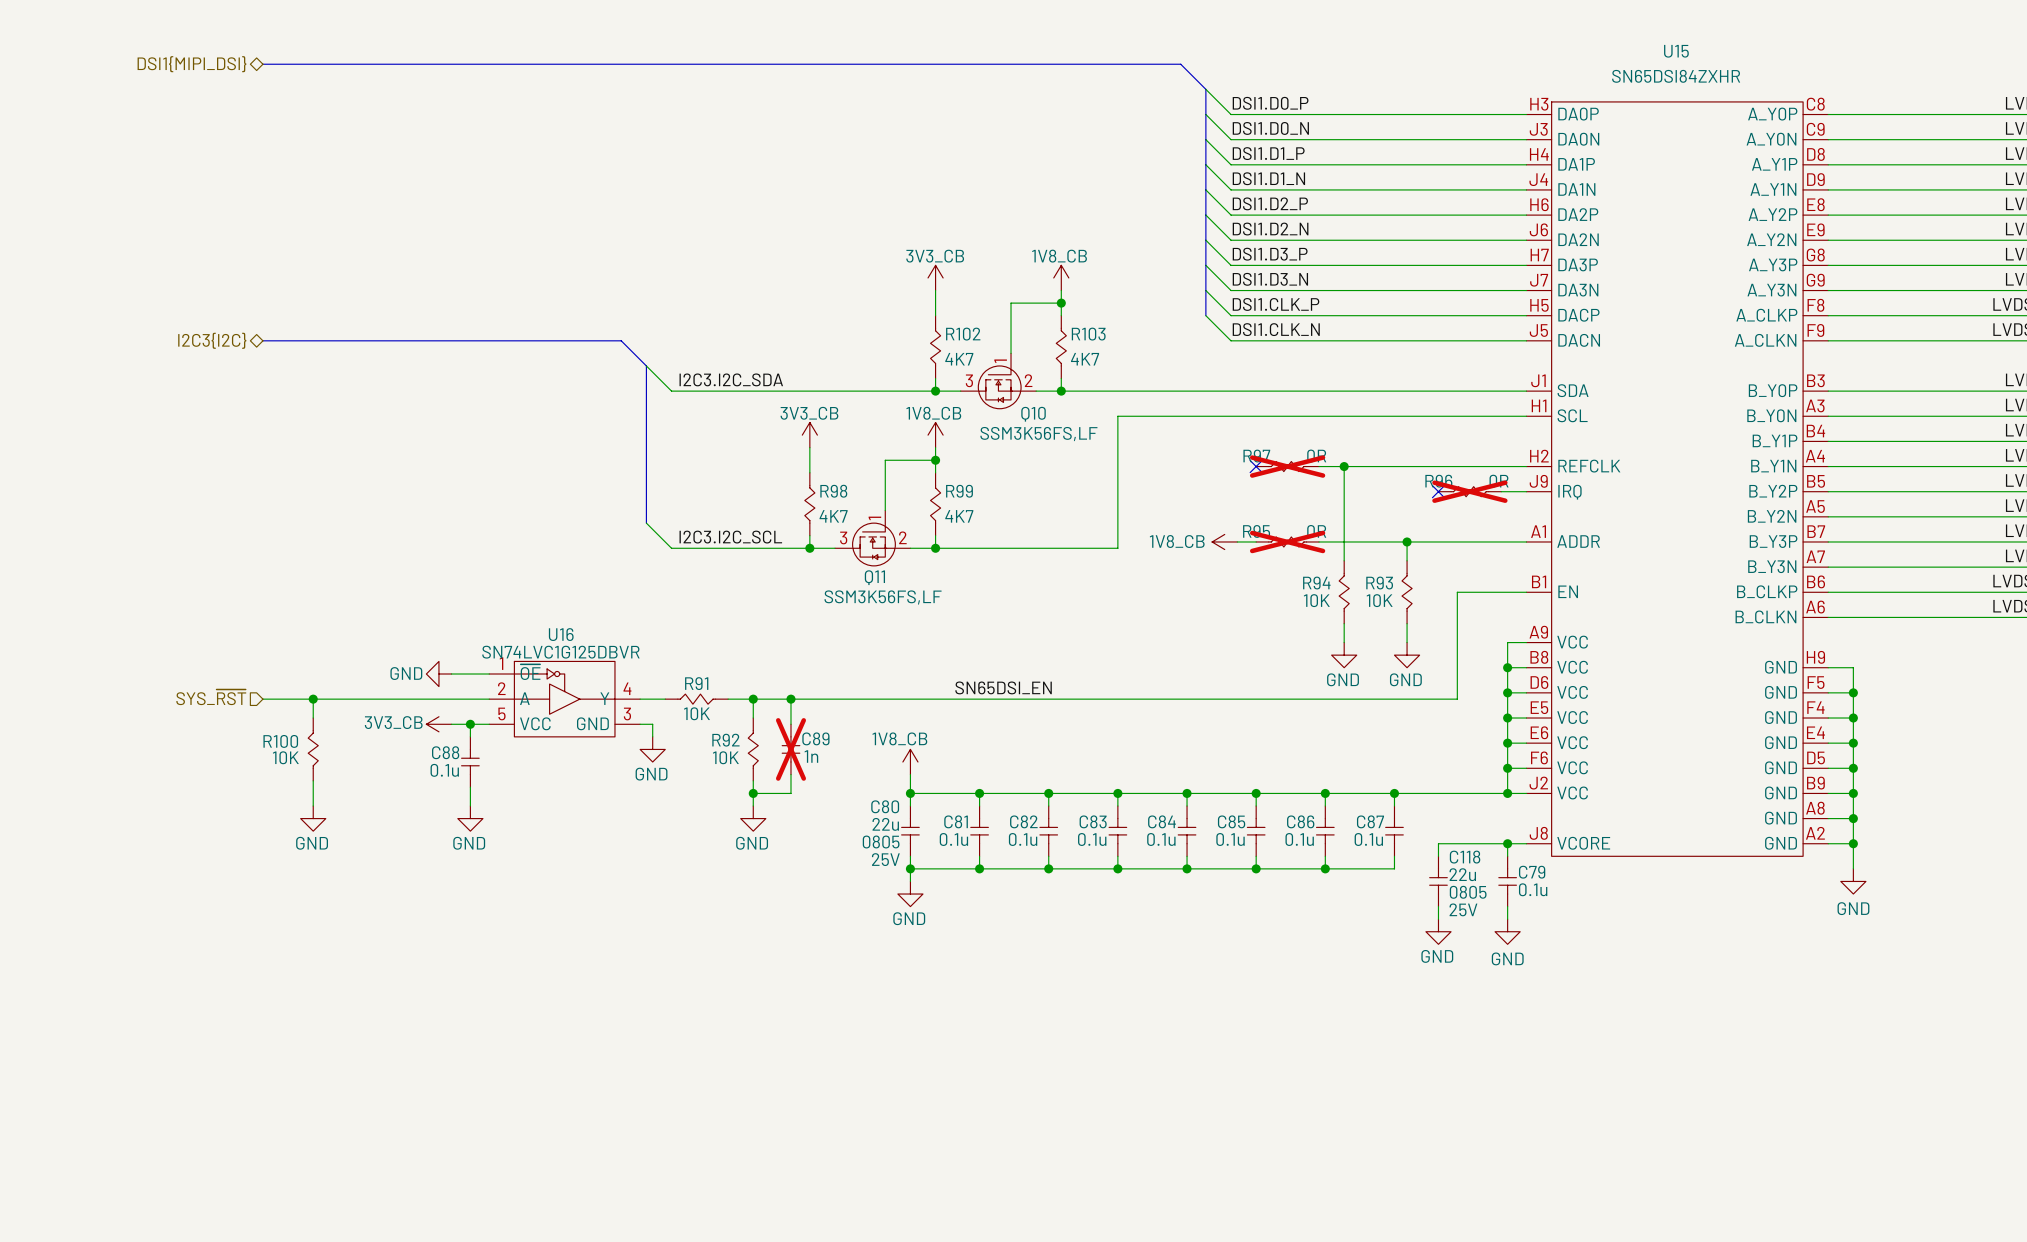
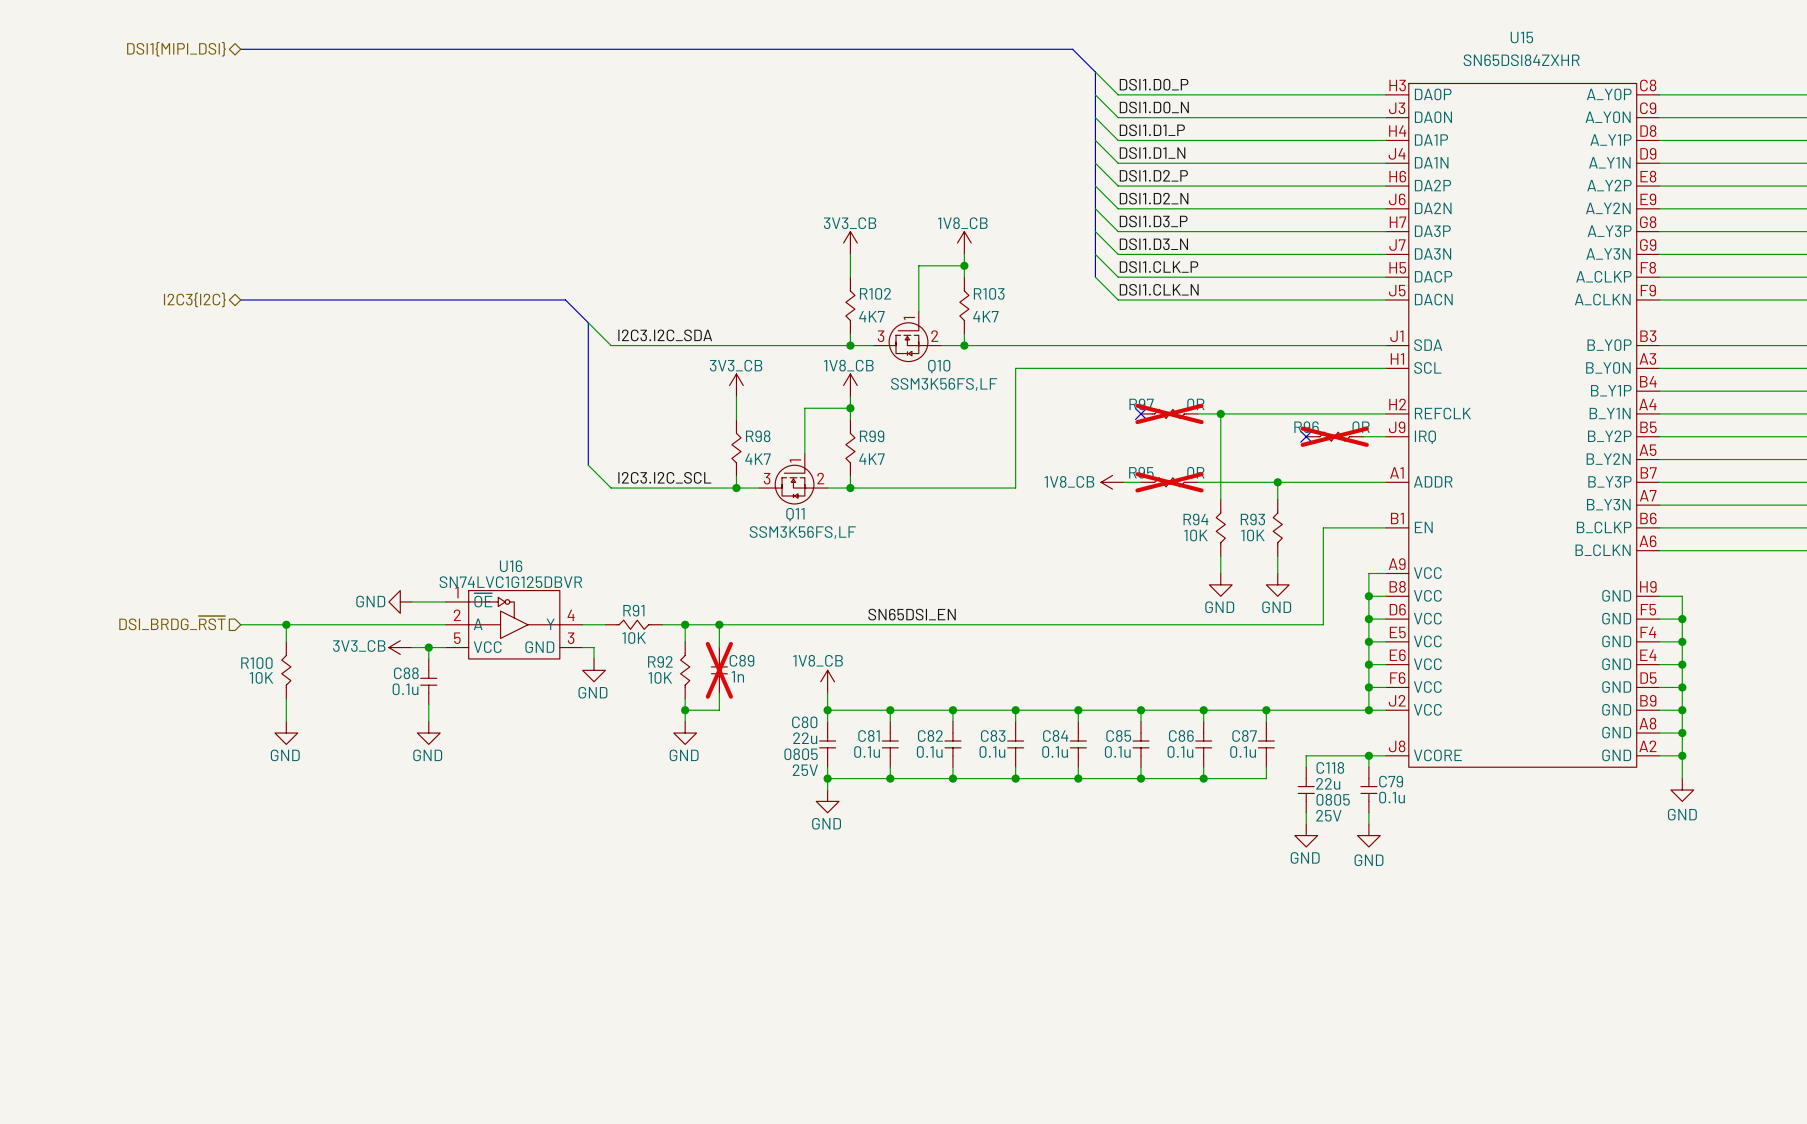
hierarchical label: SYS_~{RST} (211, 697) -> DSI_BRDG_~{RST} (172, 623)

